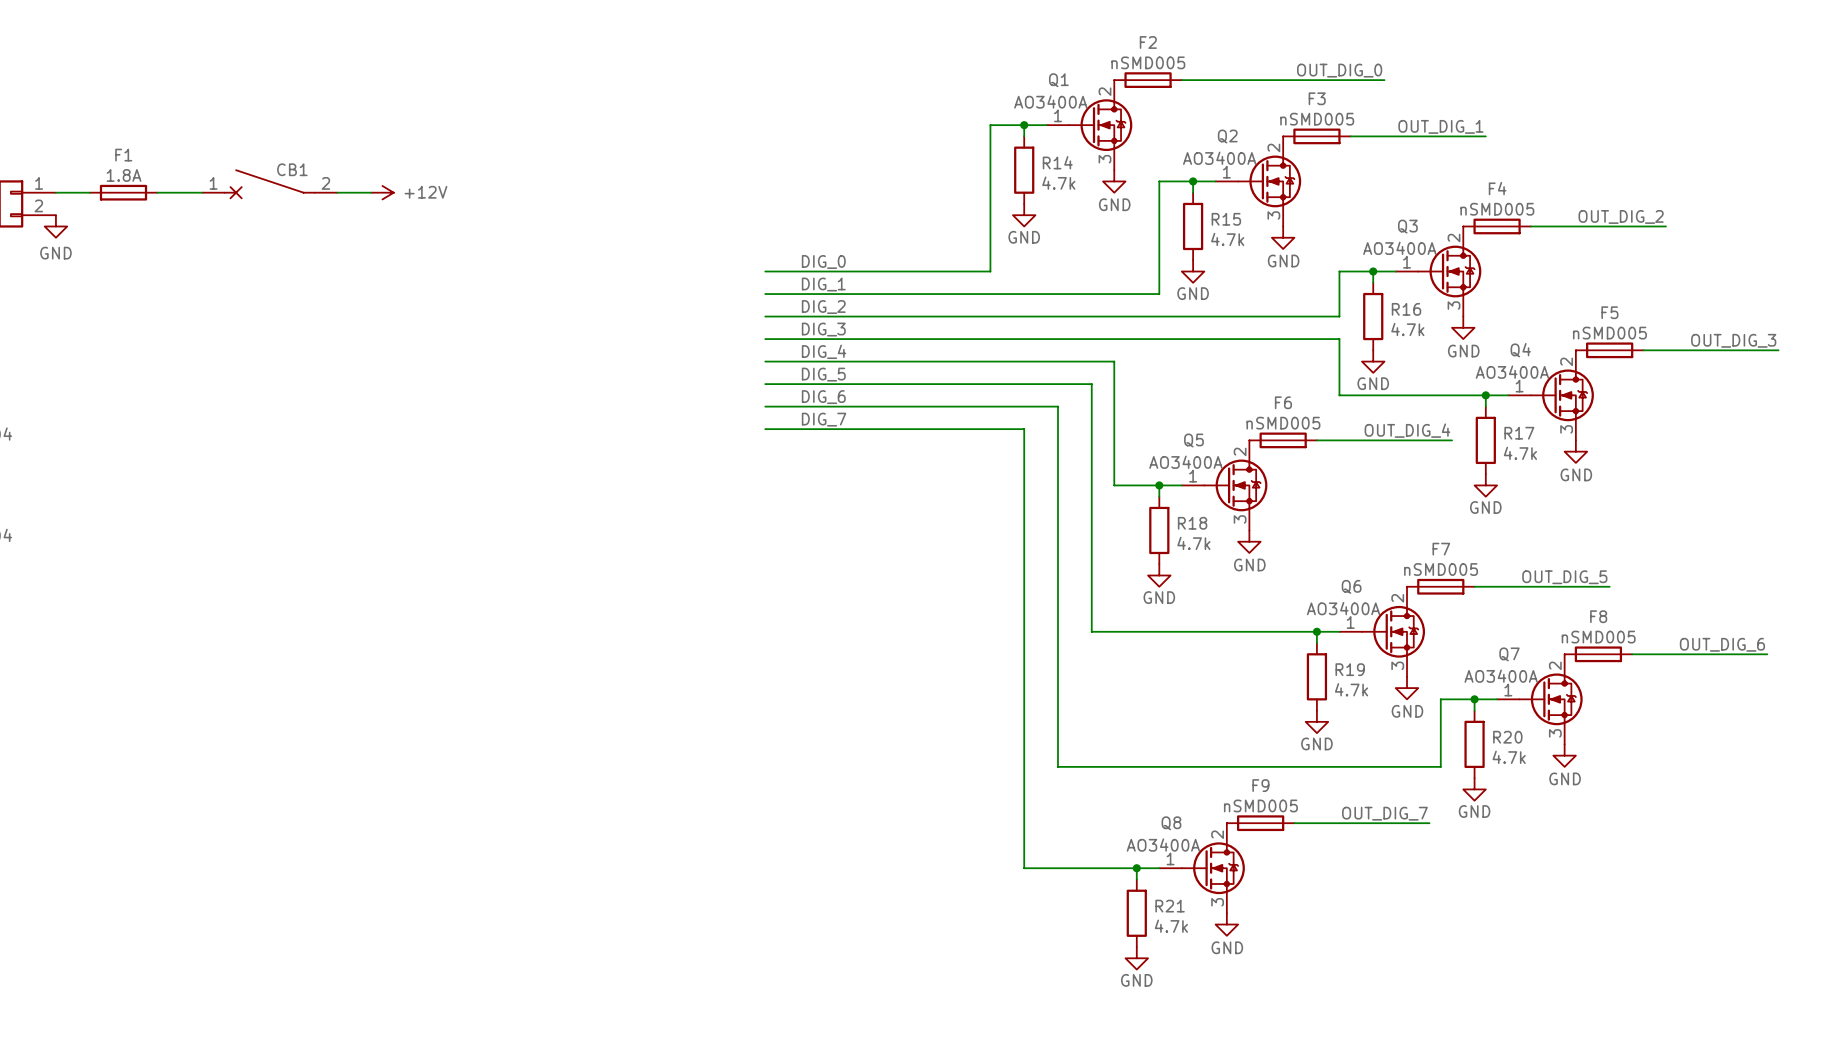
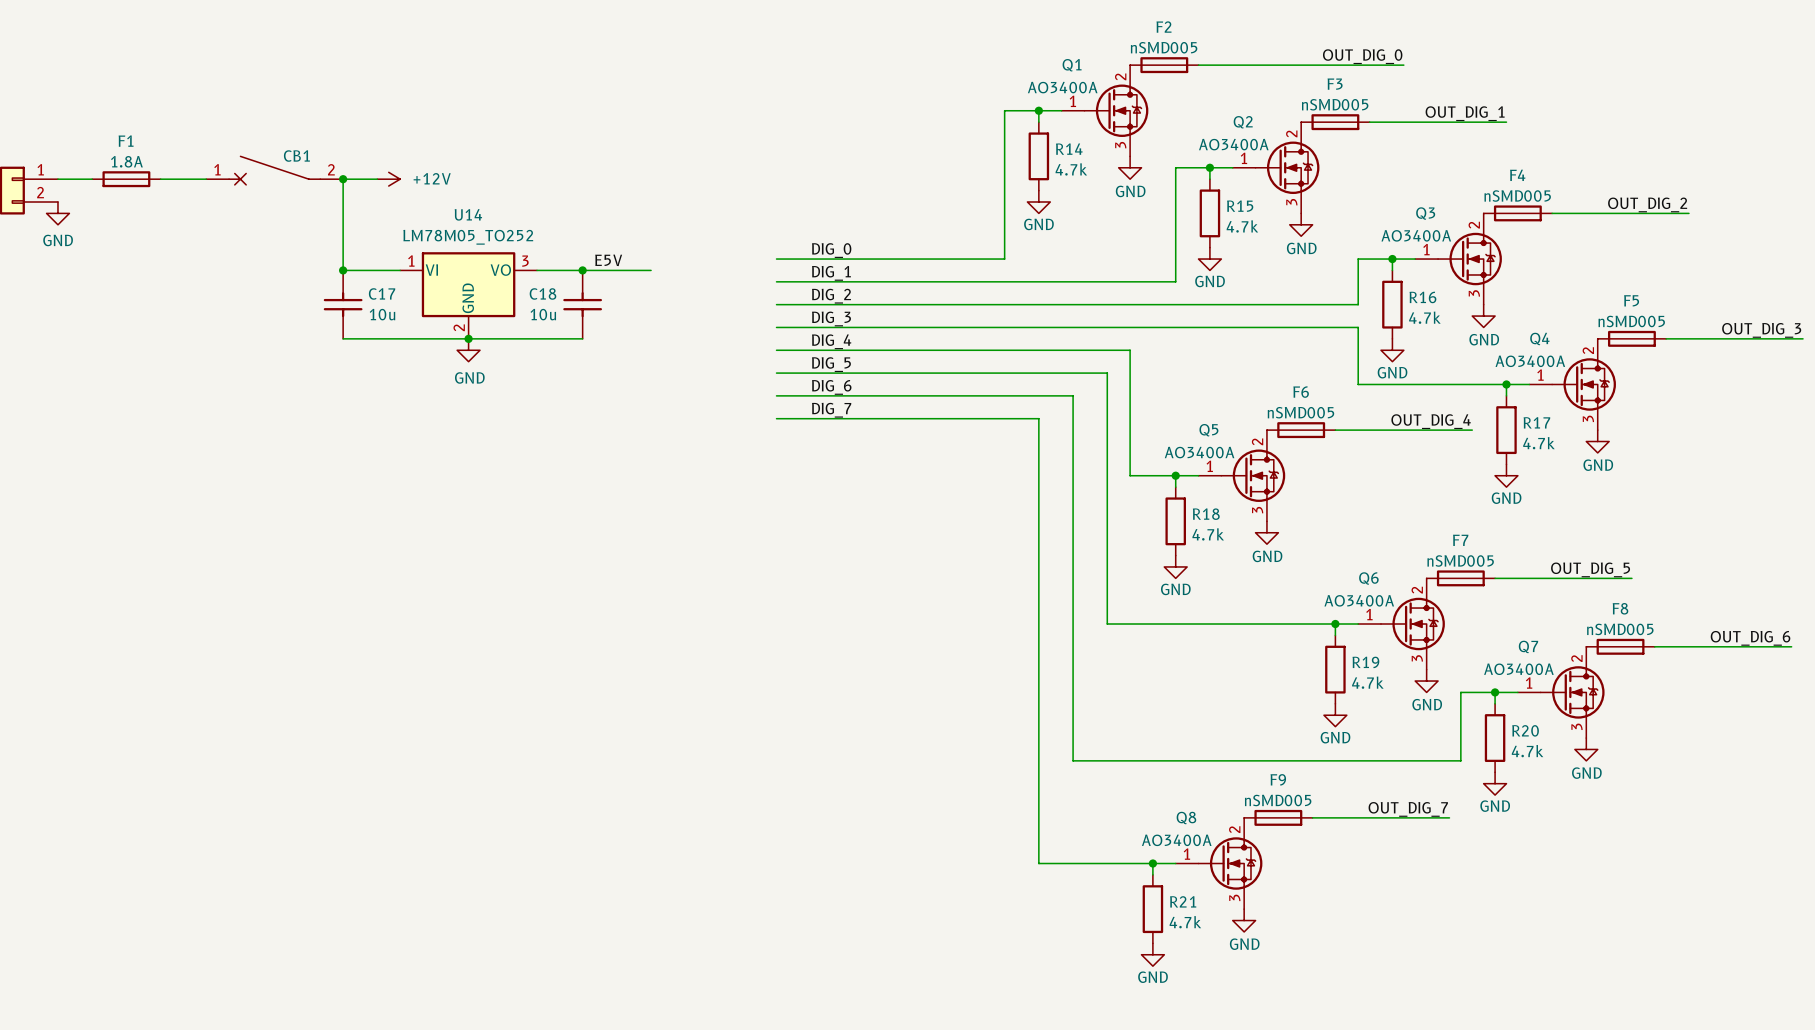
wire: none -> (343, 179) (343, 270) (400, 270)
junction: none -> (343, 179)
label: none -> E5V (608, 260)
junction: none -> (343, 270)
wire: none -> (537, 270) (651, 270)
junction: none -> (582, 270)
U14: none -> LM78M05_TO252 (468, 295)
C17: none -> 10u (343, 304)
C18: none -> 10u (582, 304)
wire: none -> (343, 338) (582, 338)
junction: none -> (468, 338)
power symbol: none -> GND (468, 350)

